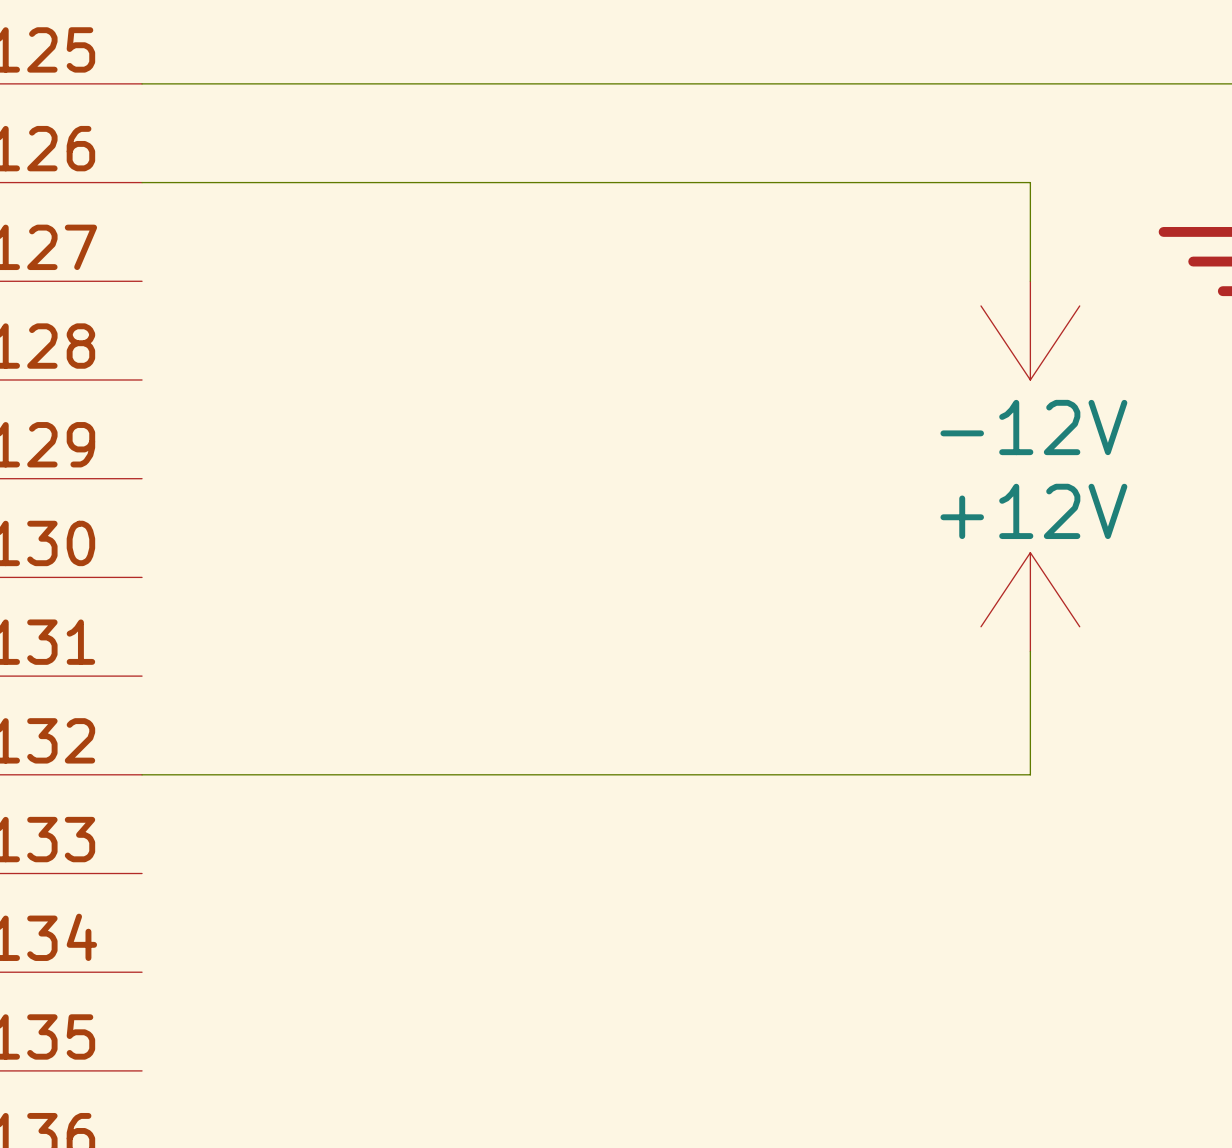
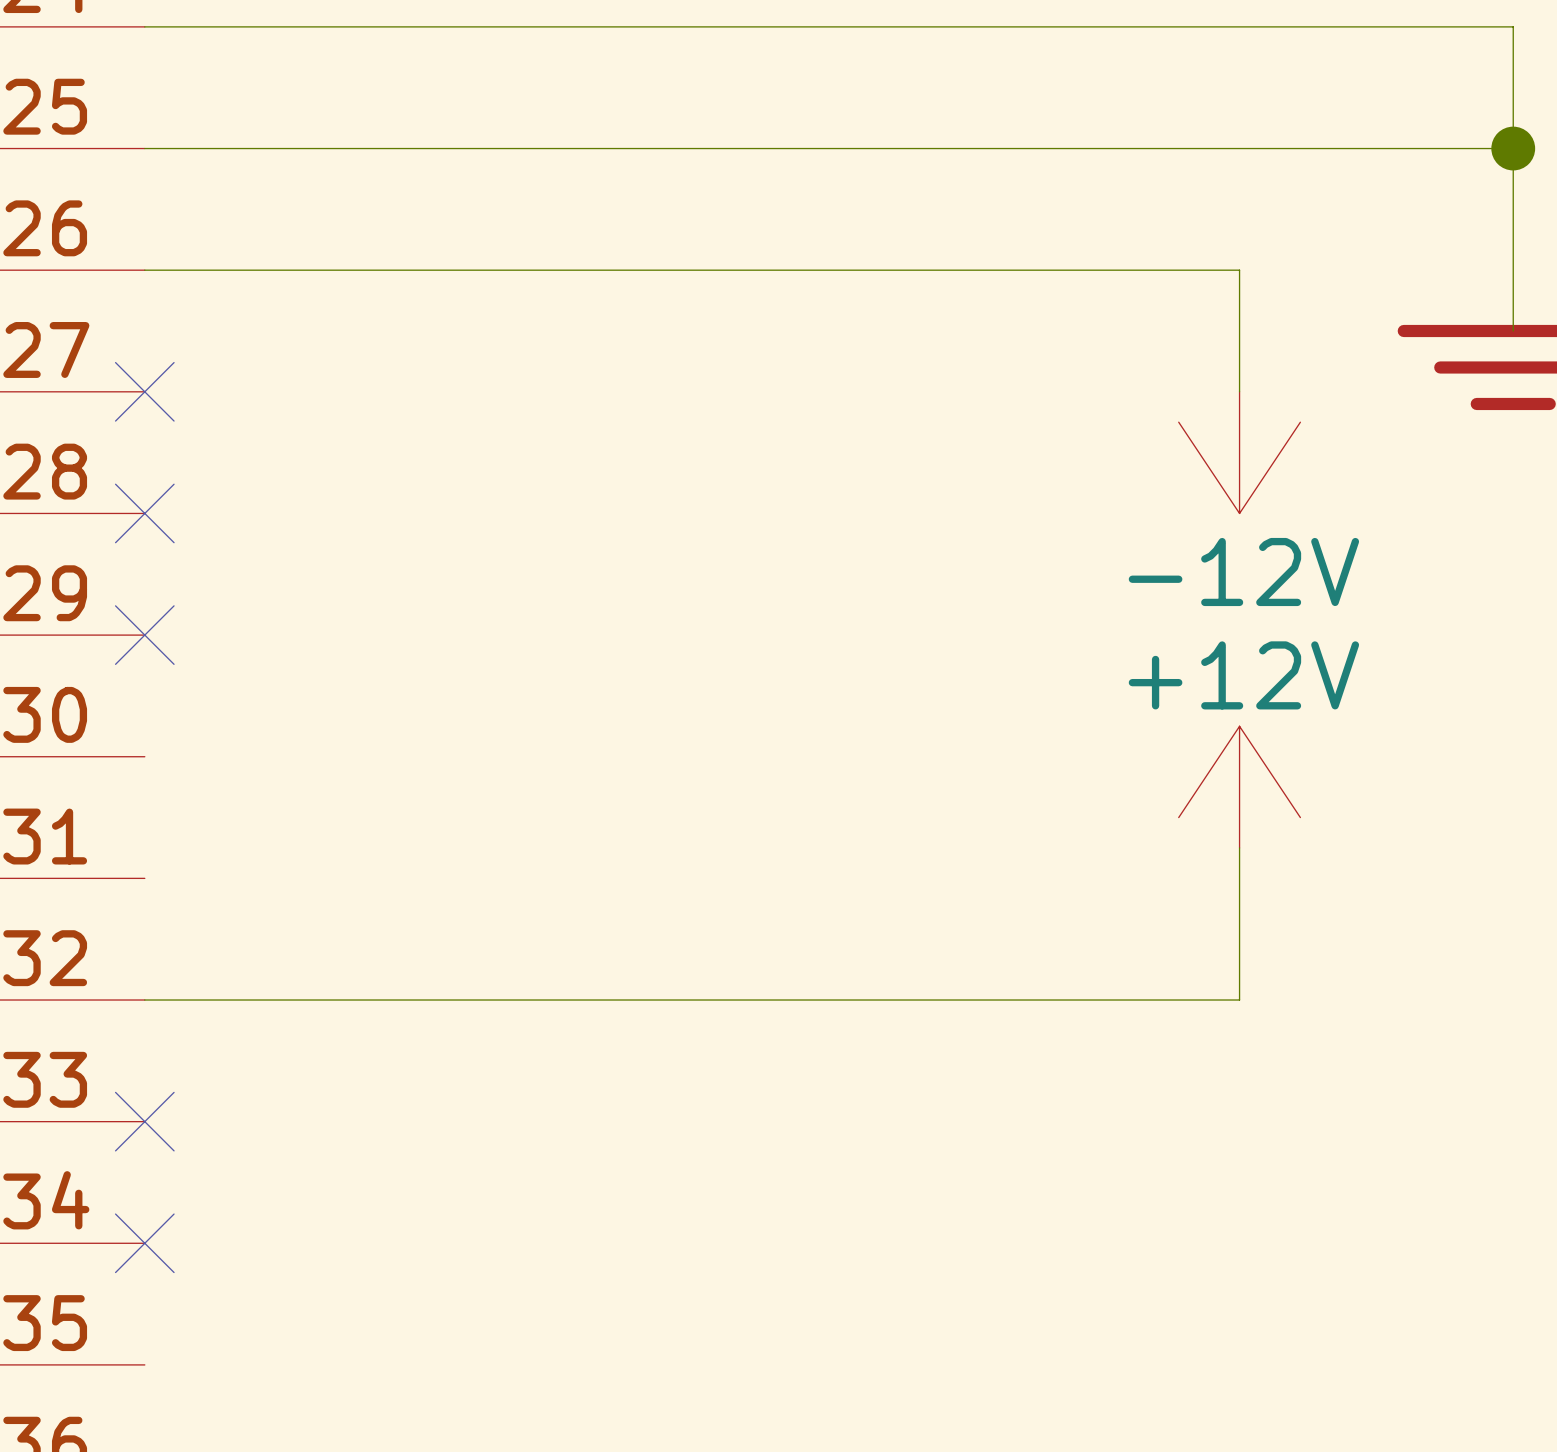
no-connect mark: none -> (144, 391)
no-connect mark: none -> (144, 513)
no-connect mark: none -> (144, 635)
no-connect mark: none -> (144, 1121)
no-connect mark: none -> (144, 1243)

